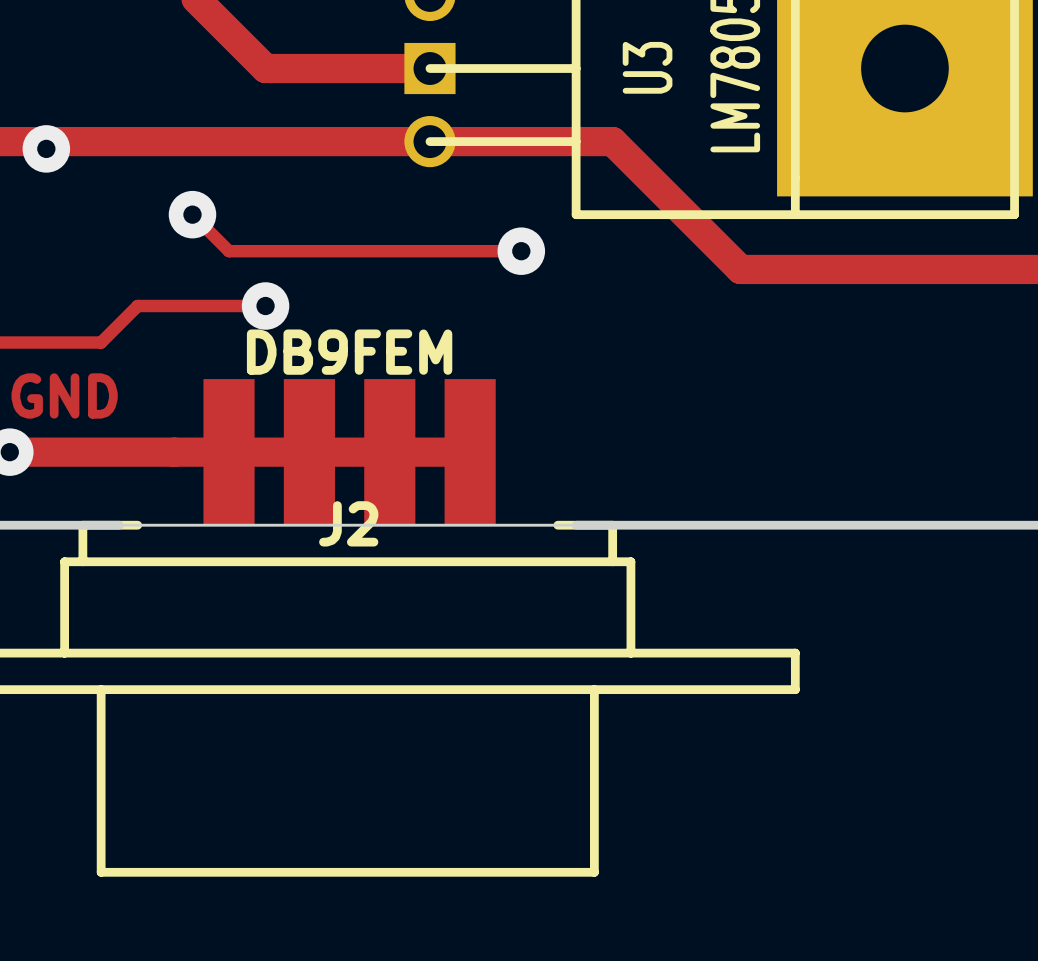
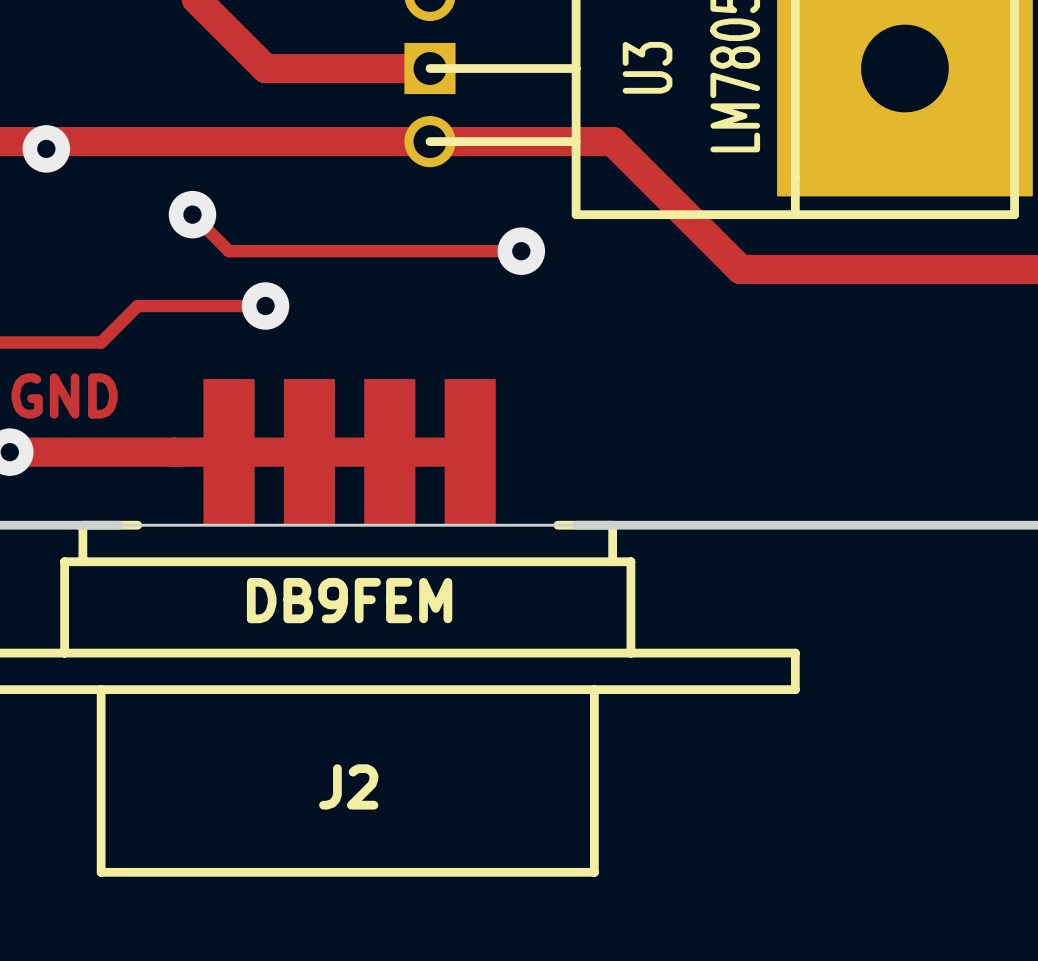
J2 value position: DB9FEM (349, 352) -> DB9FEM (349, 600)
J2 name position: J2 (348, 523) -> J2 (348, 786)

